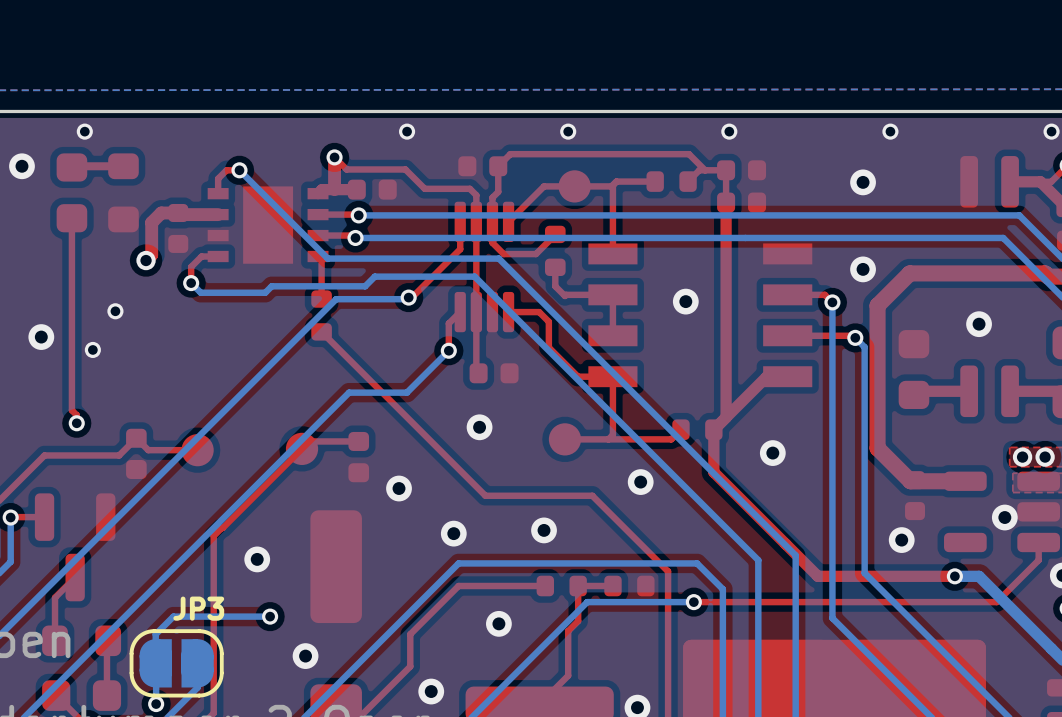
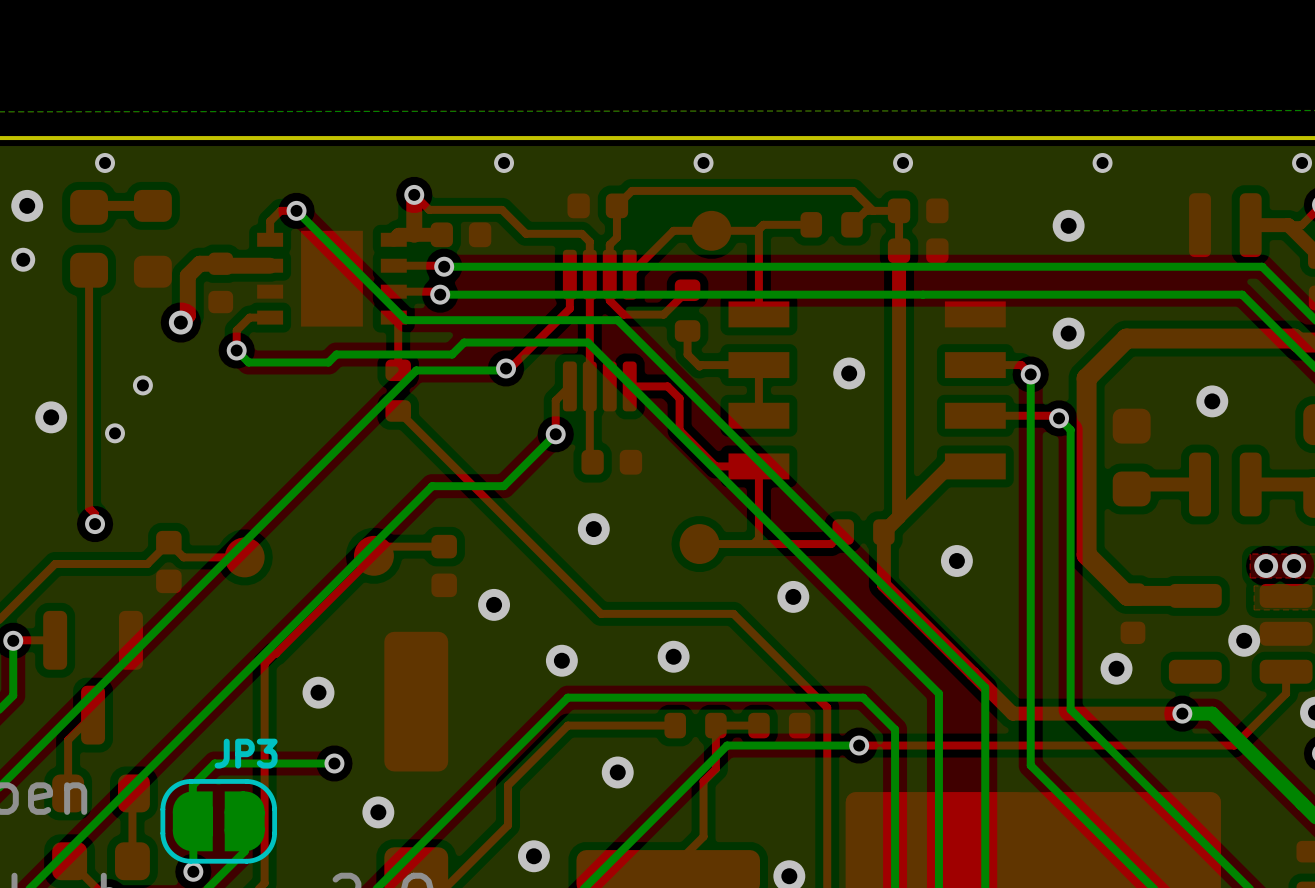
via: none -> (23, 259)

